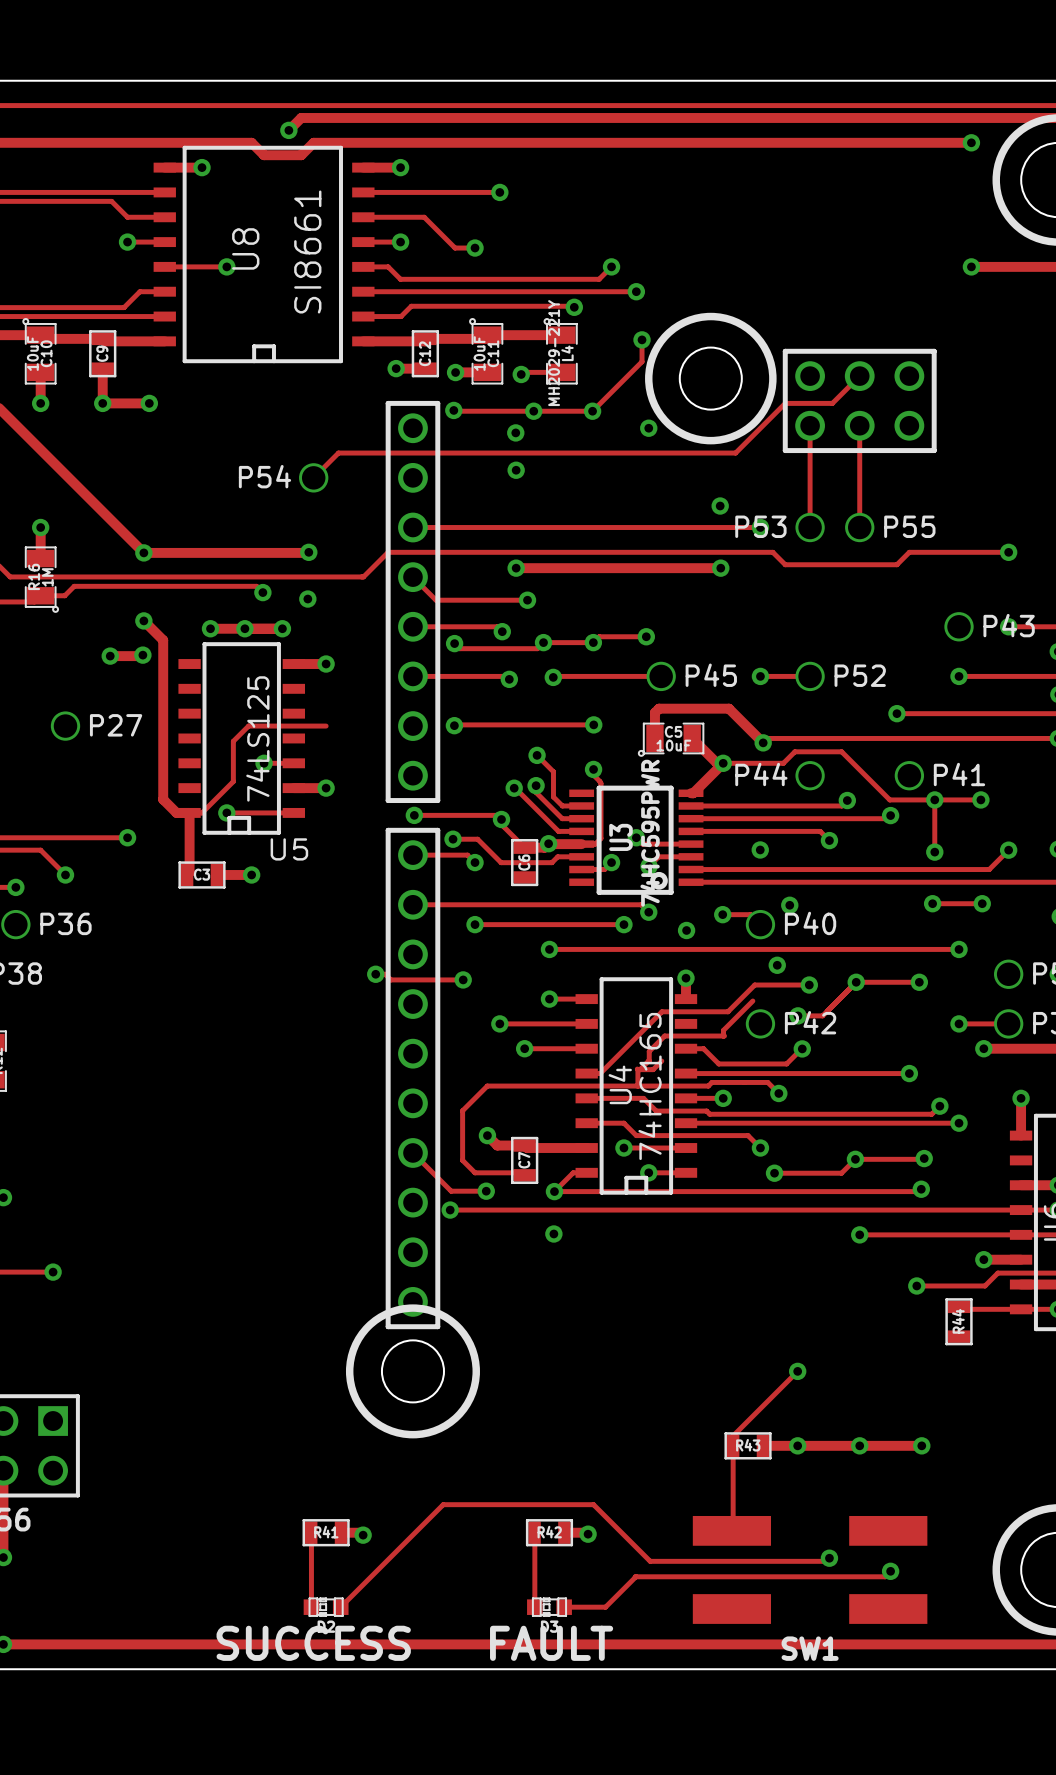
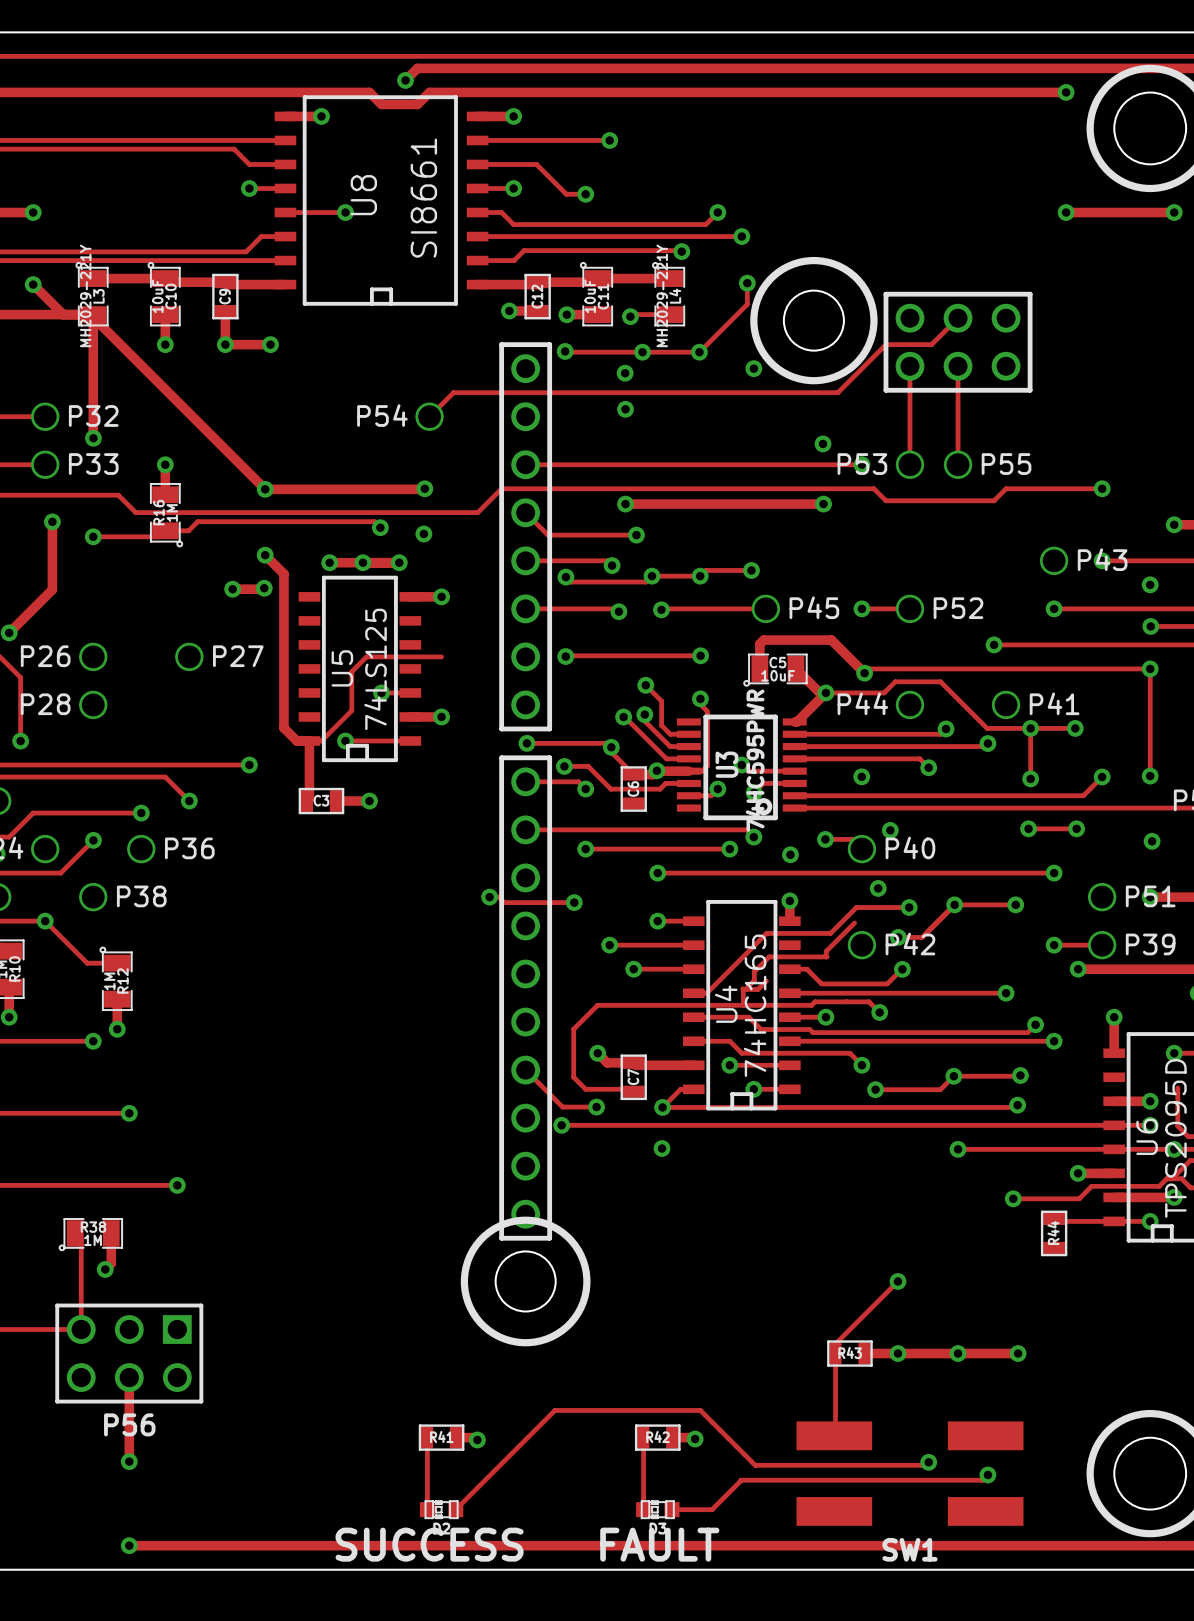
U5 name rotation: 0° (289, 849) -> 90° counterclockwise (342, 668)
U5 name position: U5 (289, 849) -> U5 (342, 668)

